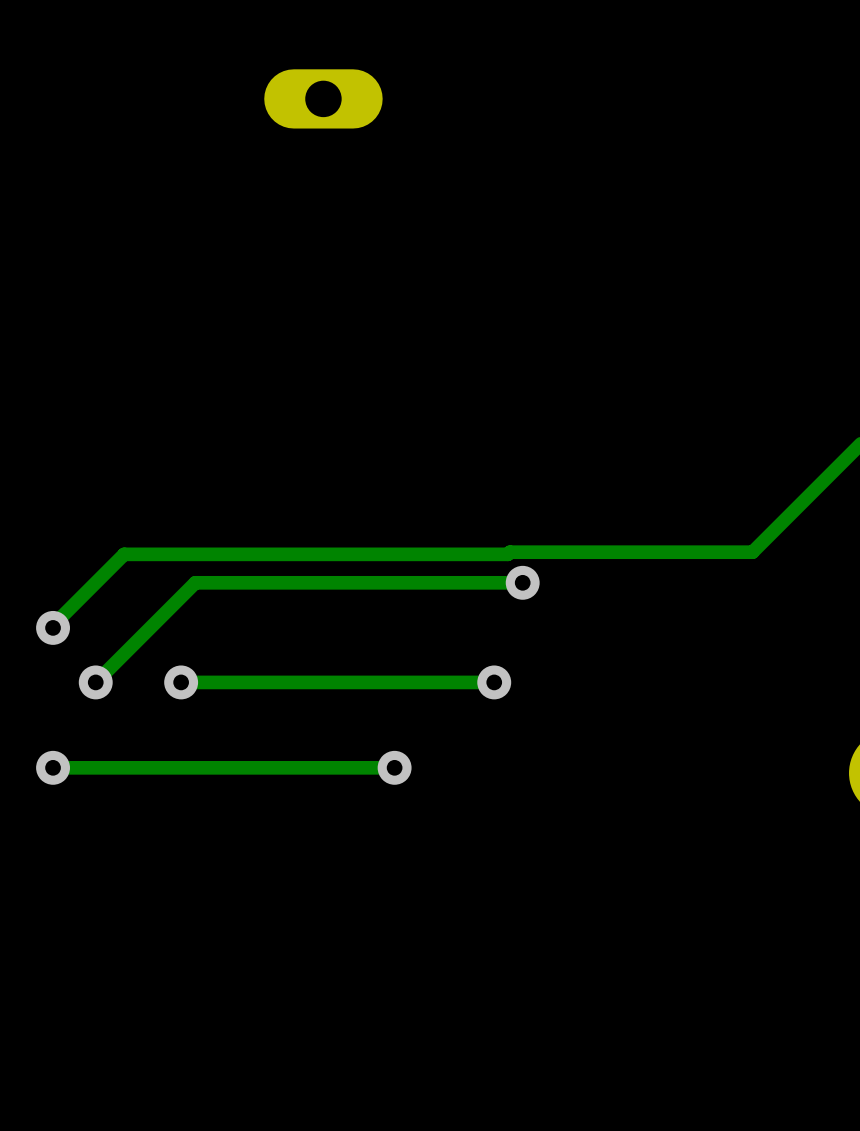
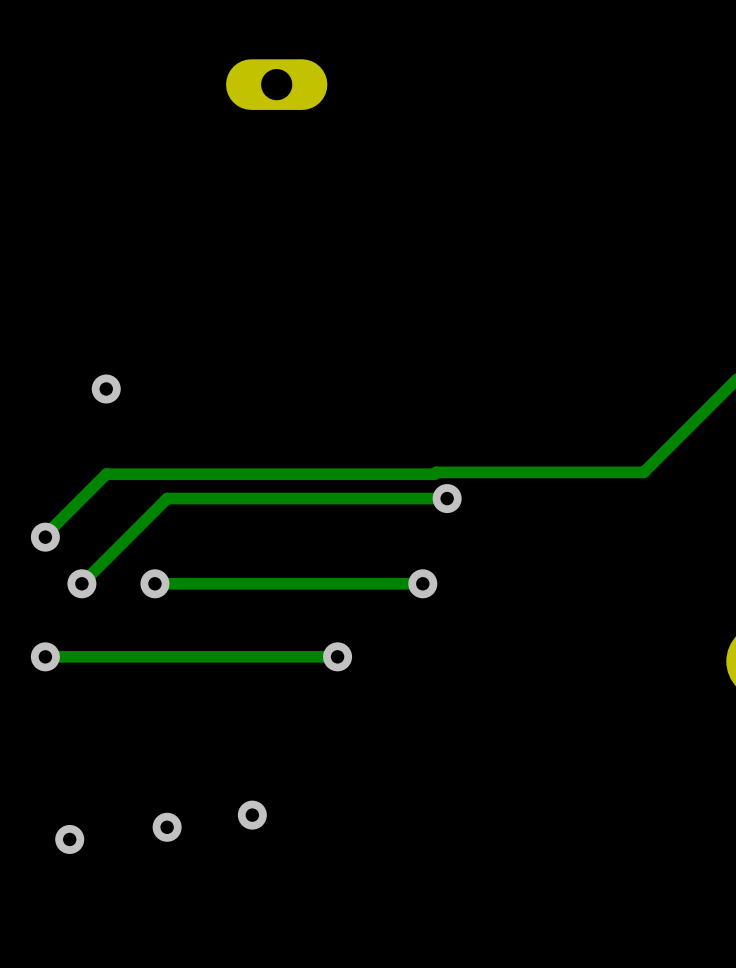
via: none -> (106, 388)
via: none -> (252, 815)
via: none -> (167, 827)
via: none -> (69, 839)

